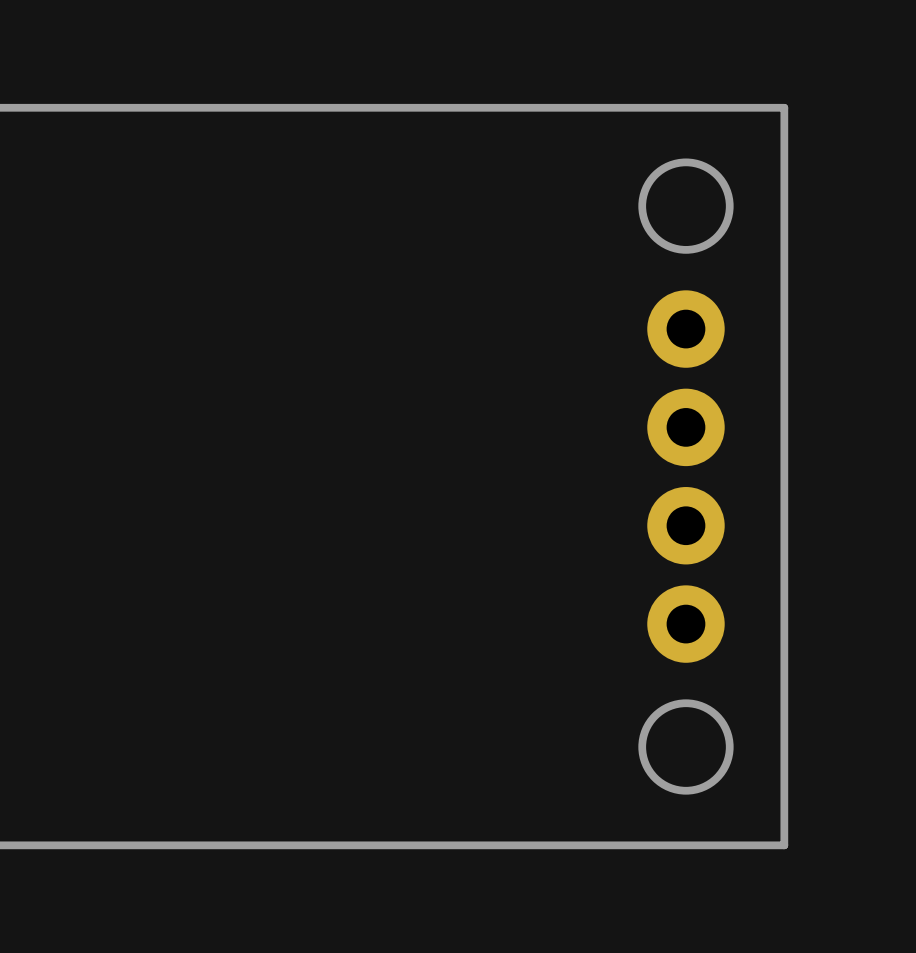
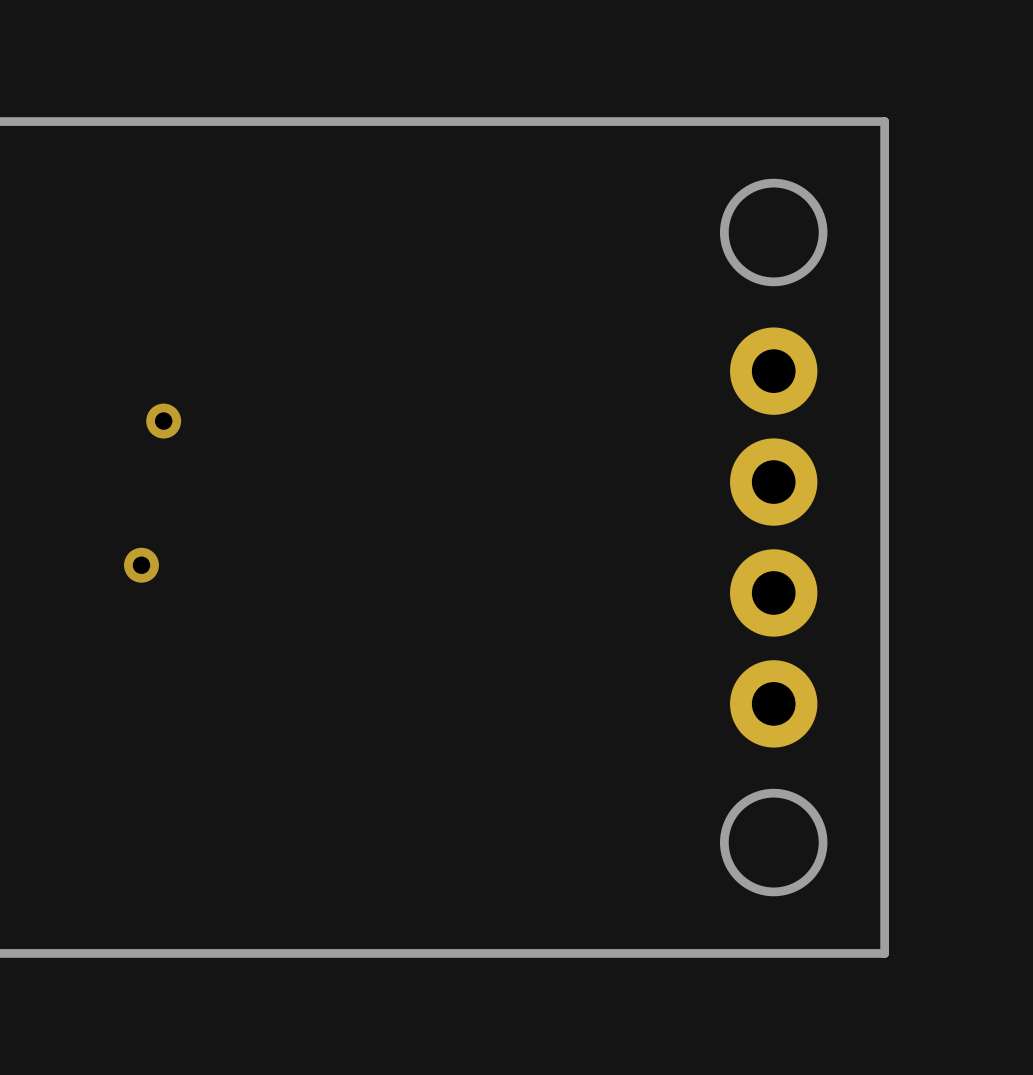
via: none -> (163, 421)
via: none -> (141, 565)

